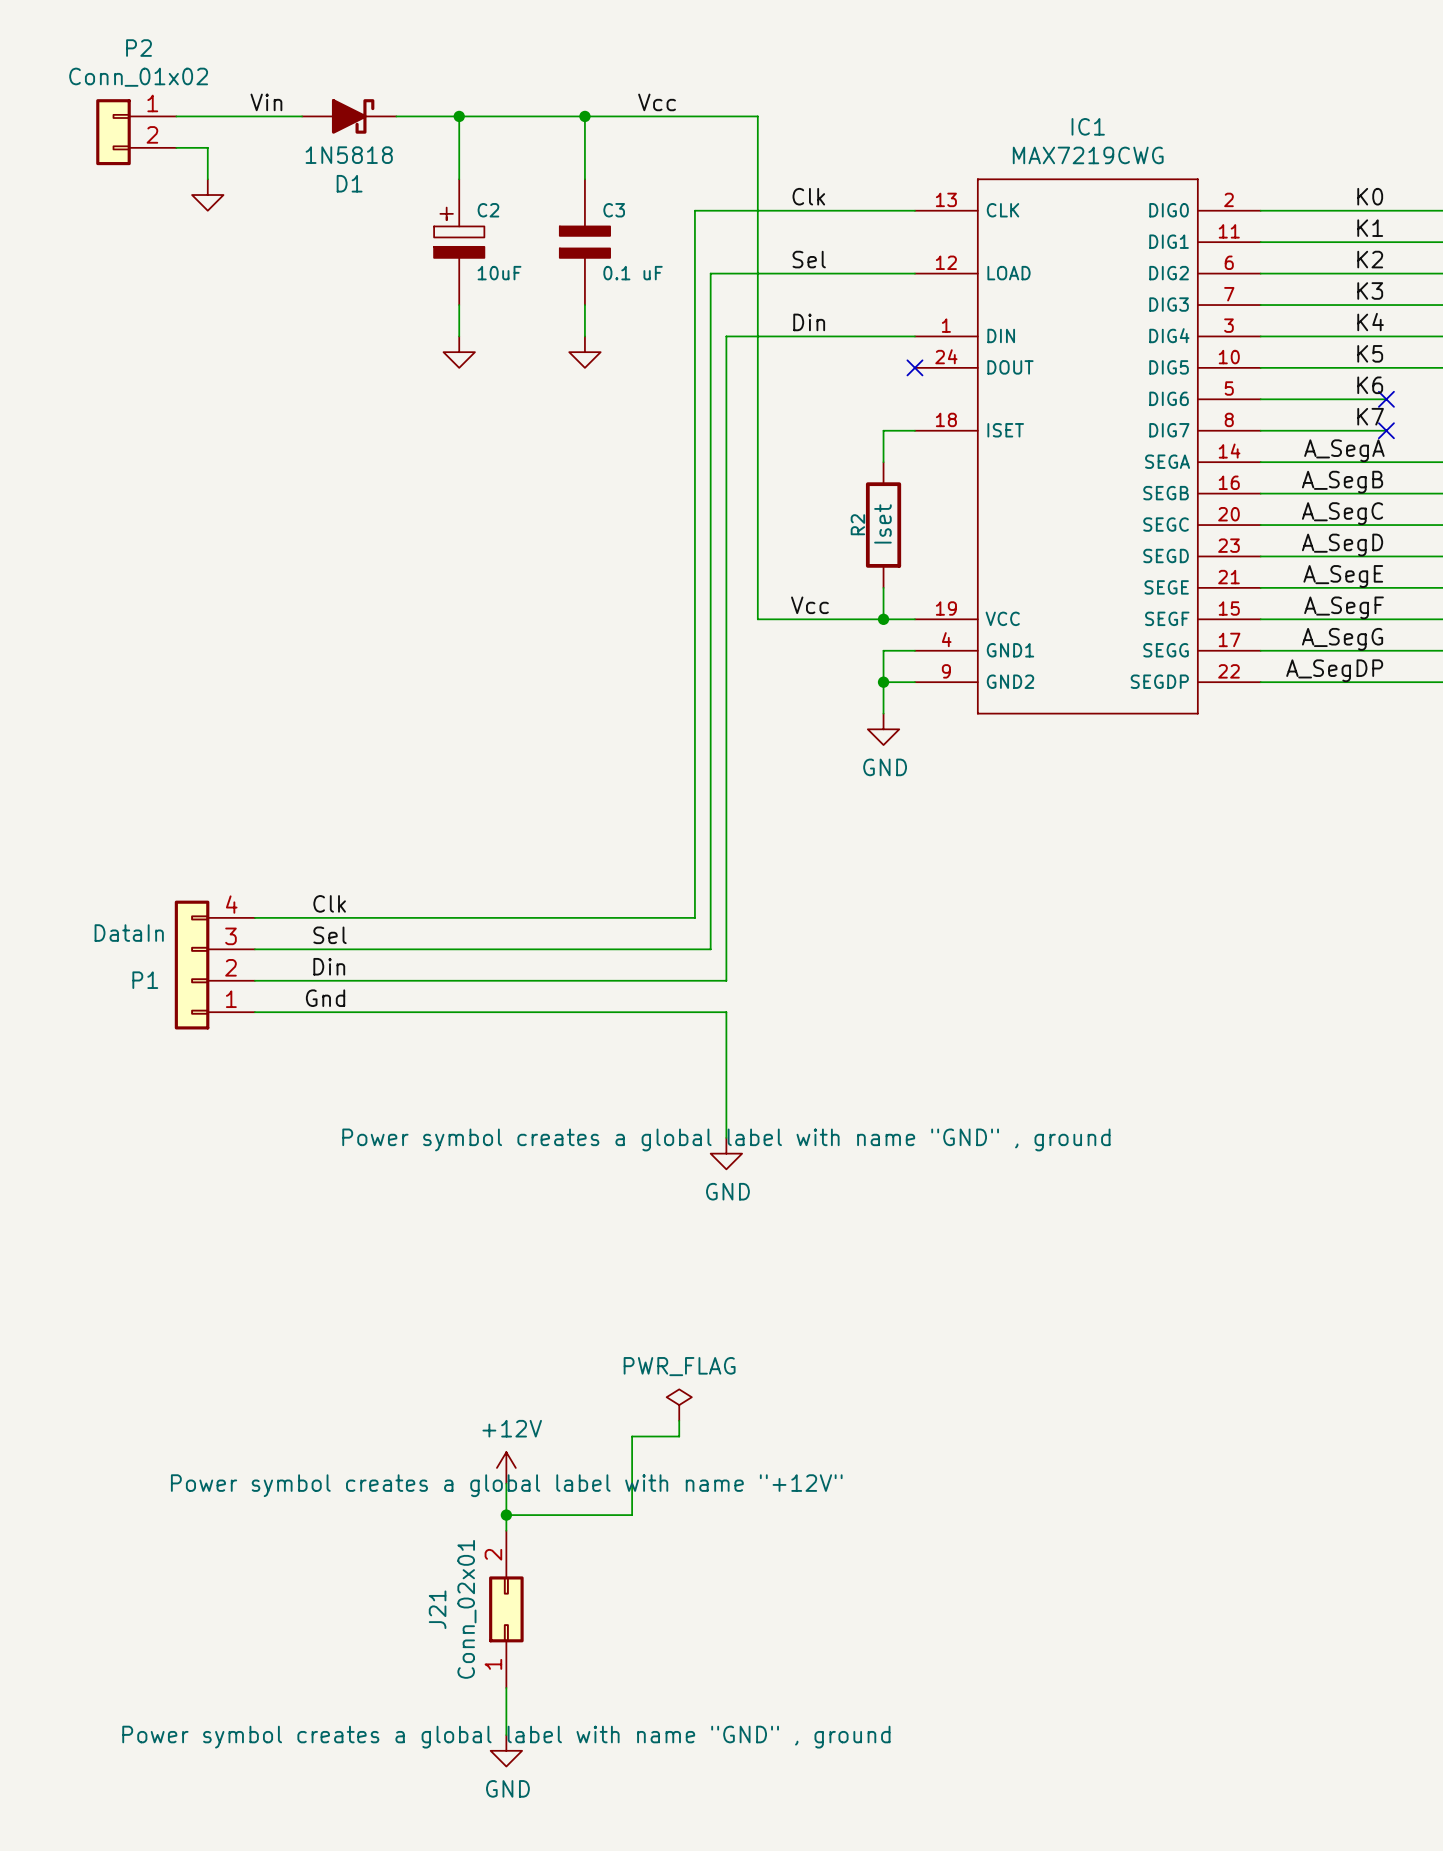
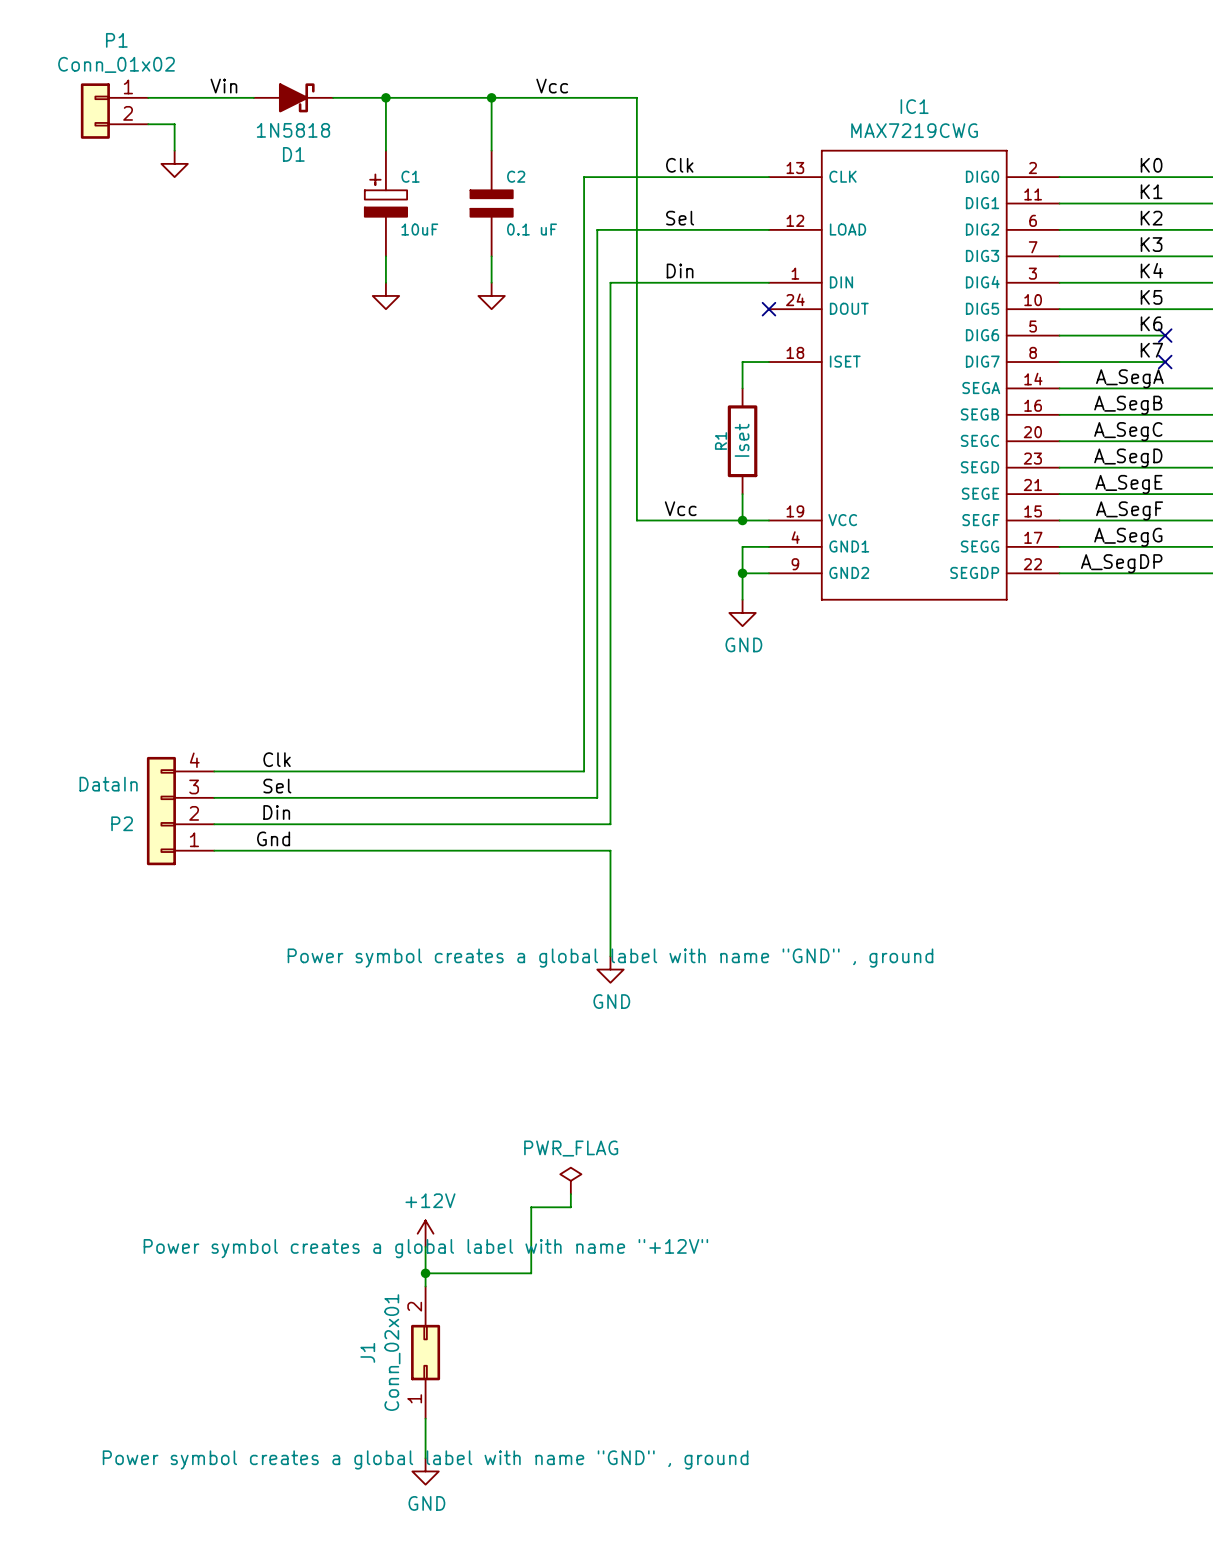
P2 name: P2 (139, 48) -> P1 (116, 40)
C2 name: C2 (488, 210) -> C1 (410, 176)
C3 name: C3 (614, 210) -> C2 (516, 176)
R2 name: R2 (857, 524) -> R1 (721, 441)
P1 name: P1 (145, 980) -> P2 (122, 823)
J21 name: J21 (437, 1609) -> J1 (367, 1352)

